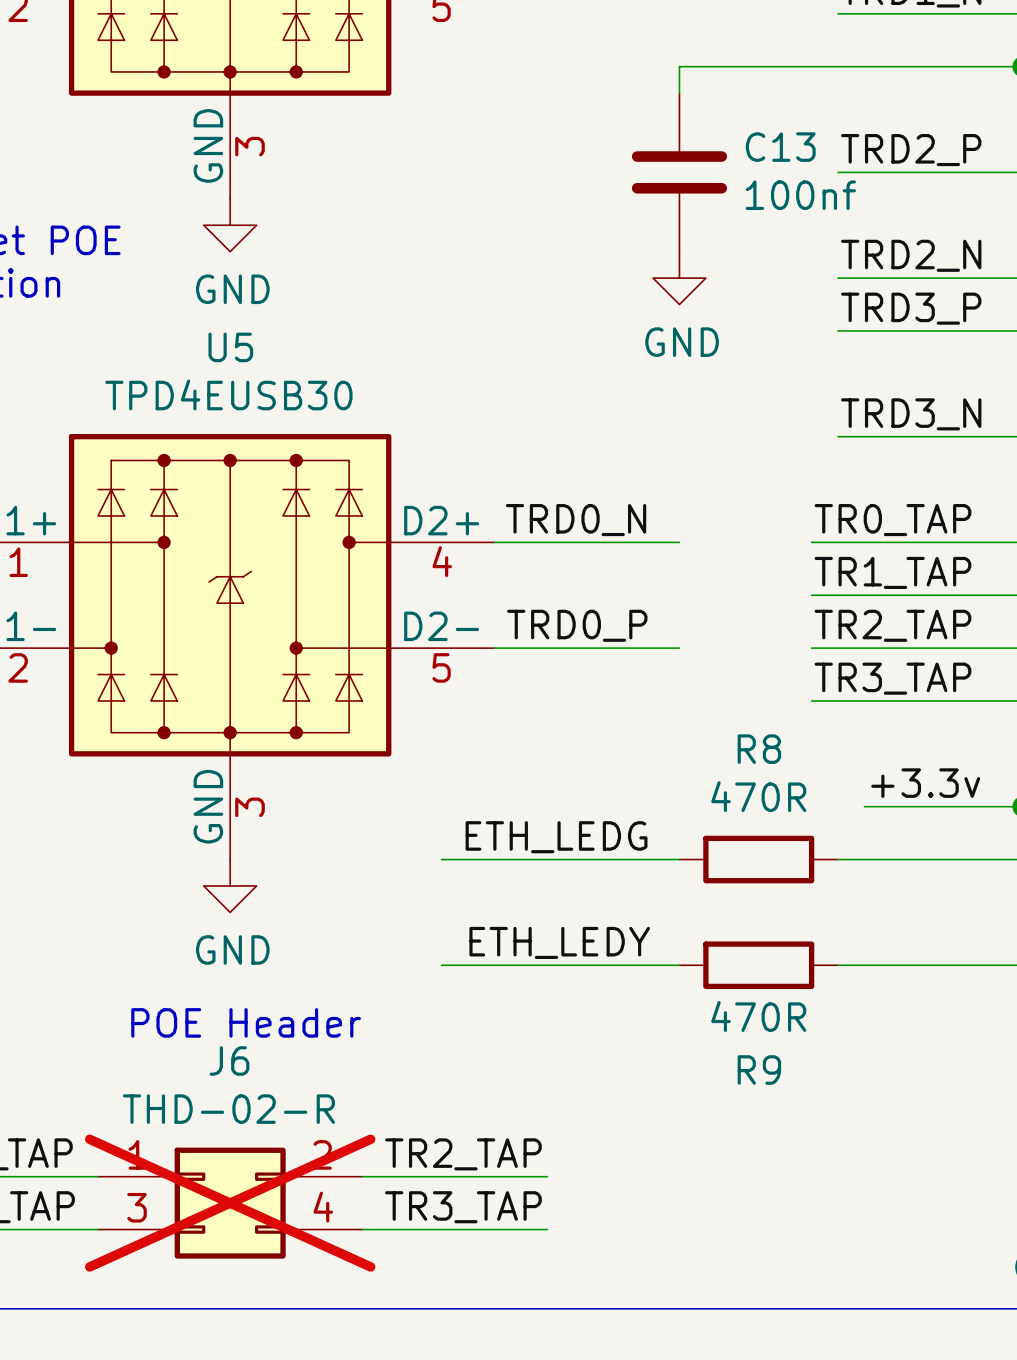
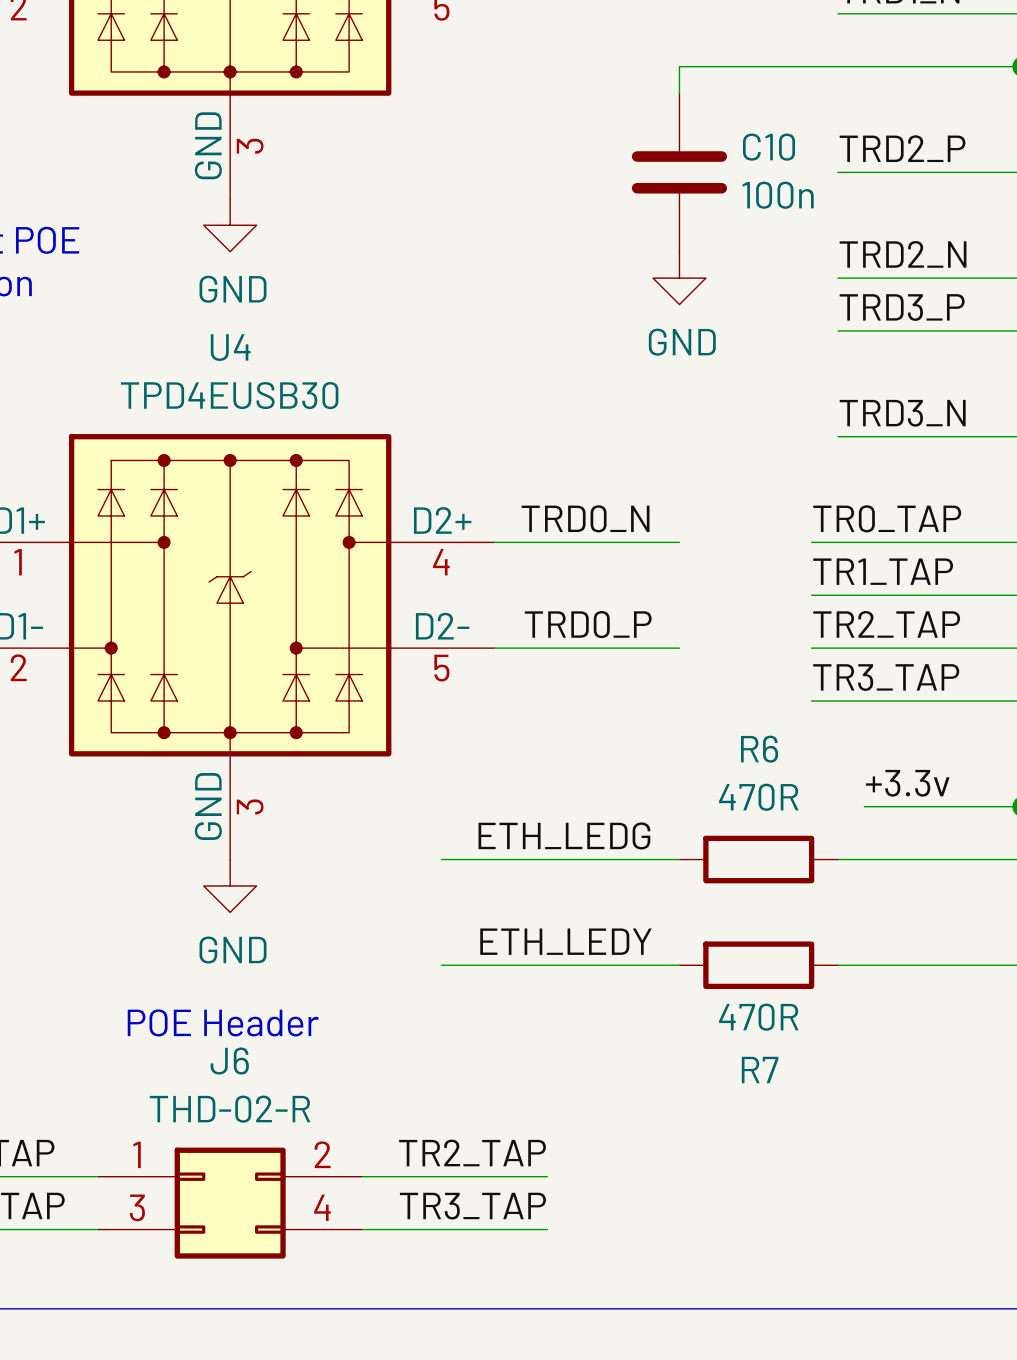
C13 name: C13 (780, 147) -> C10 (769, 147)
C13 value: 100nf (800, 195) -> 100n (778, 195)
U5 name: U5 (230, 347) -> U4 (230, 347)
R8 name: R8 (759, 749) -> R6 (759, 749)
R9 name: R9 (759, 1069) -> R7 (760, 1069)
J6 do-not-place cross: (230, 1203) -> none

